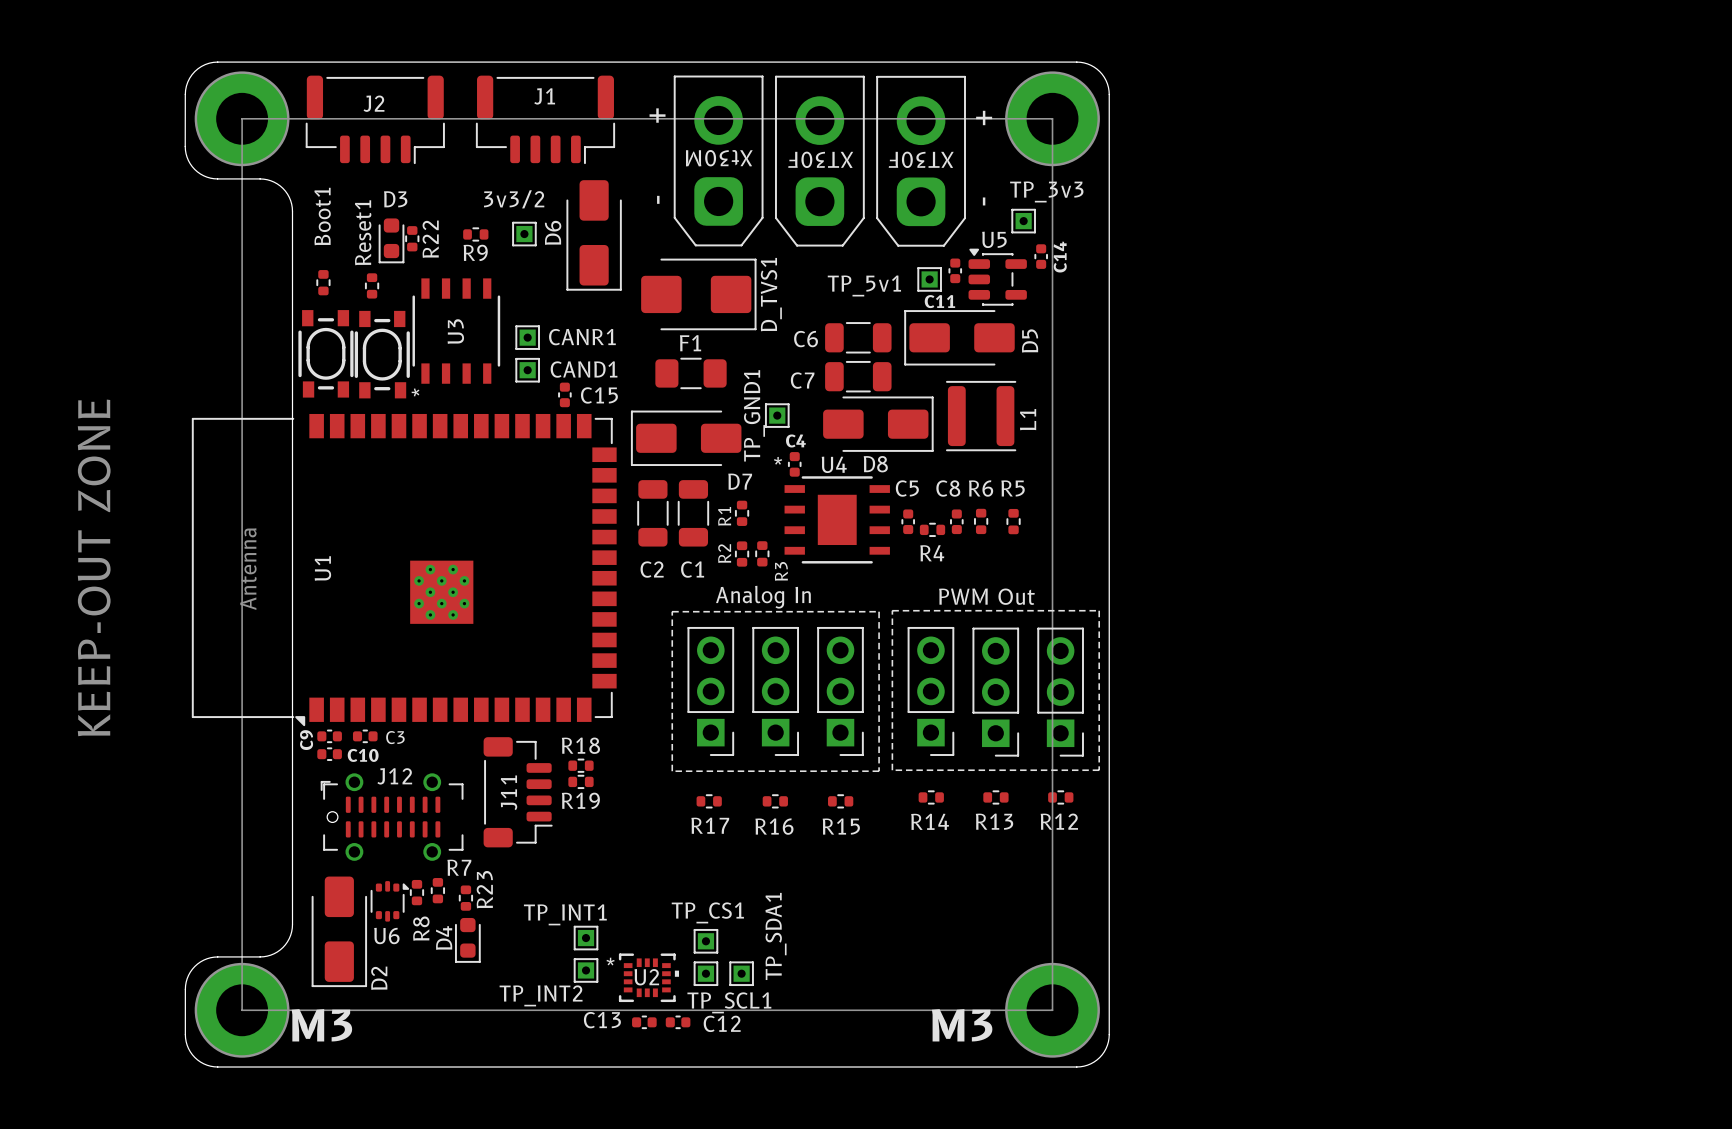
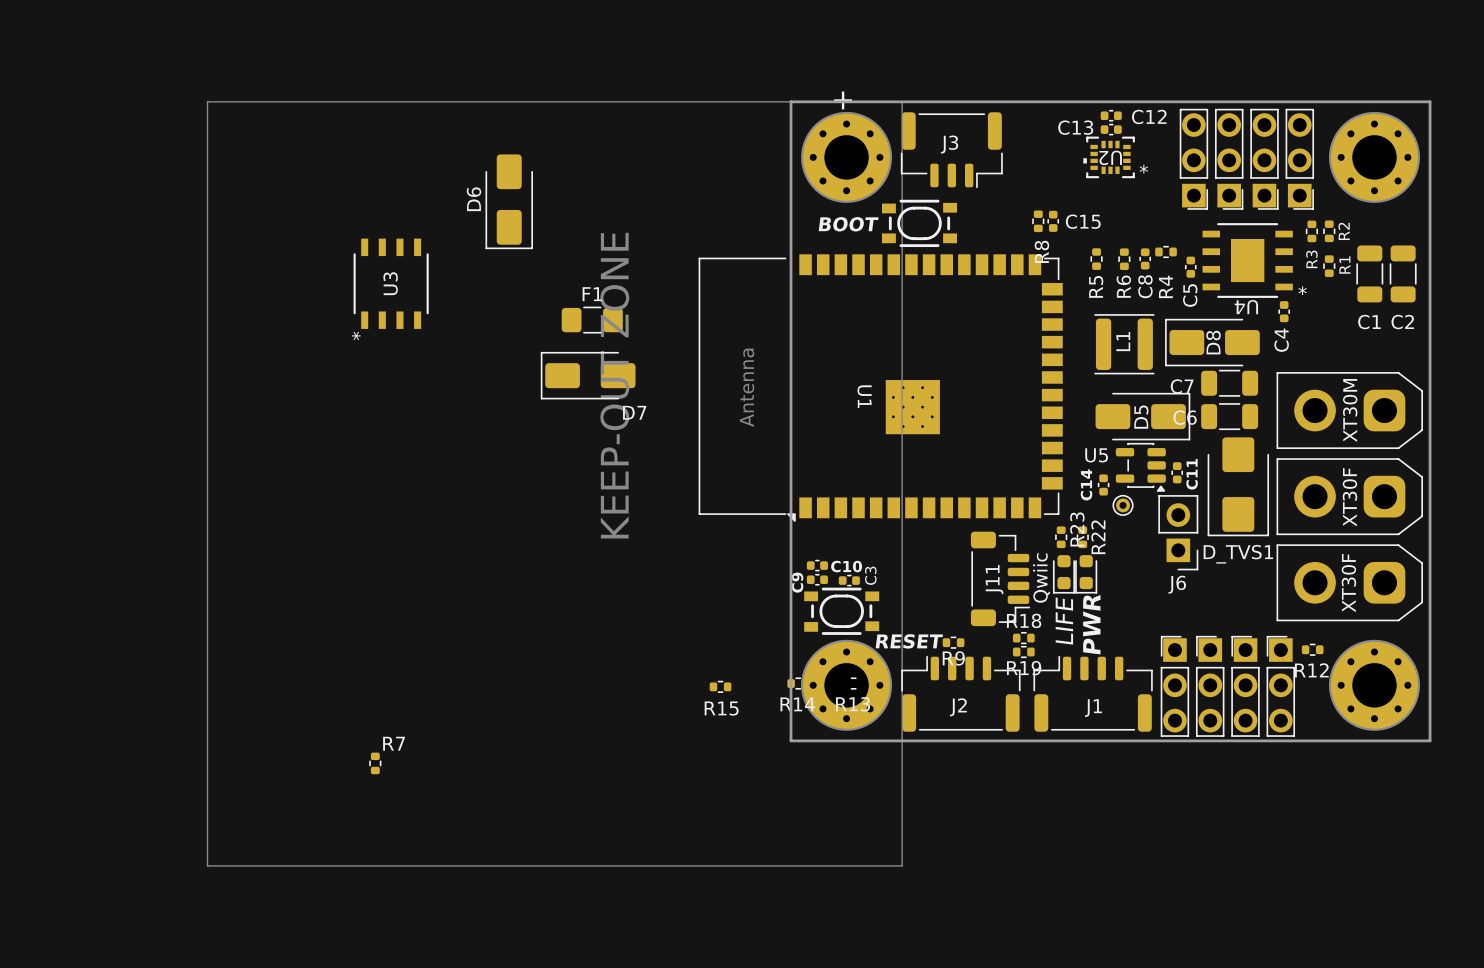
board edge: (217, 62) (1076, 62) (1090, 65) (1102, 74) (1107, 83) (1109, 94) (1109, 1034) (1106, 1048) (1097, 1059) (1087, 1065) (1076, 1067) (217, 1067) (203, 1063) (192, 1054) (187, 1045) (185, 1034) (185, 985) (192, 969) (200, 961) (210, 957) (263, 956) (274, 953) (287, 941) (292, 924) (292, 207) (285, 191) (274, 182) (263, 179) (210, 178) (197, 171) (188, 160) (185, 146) (186, 86) (189, 78) (198, 68) (209, 63) (217, 62) -> none
part: (242, 118) -> none
board edge: none -> (790, 101) (1430, 101) (1430, 740) (790, 740) (790, 101)
part: (1052, 118) -> none
J2 rotation: 0° (375, 119) -> 180° (960, 693)
J2 position: (375, 119) -> (960, 693)
J1 rotation: 0° (545, 119) -> 180° (1093, 693)
J1 position: (545, 119) -> (1093, 693)
text: Xt30M (719, 158) -> none
text: XT30F (820, 159) -> none
text: XT30F (921, 159) -> none
part: (718, 160) -> none
part: (819, 161) -> none
part: (921, 161) -> none
J3: none -> (951, 150)
part: none -> (846, 157)
part: none -> (1374, 157)
part: none -> (1193, 159)
part: none -> (1229, 159)
part: none -> (1264, 159)
part: none -> (1299, 159)
text: - (984, 201) -> none
TP_3v3: (1023, 221) -> none
R9 position: (475, 234) -> (953, 642)
3v3/2: (524, 234) -> none
R22 position: (412, 238) -> (1082, 537)
U5 name position: U5 (994, 239) -> U5 (1096, 455)
D3: (391, 240) -> none
C14 position: (1041, 256) -> (1103, 484)
C14 name position: C14 (1060, 257) -> C14 (1086, 484)
part: none -> BOOT (919, 223)
R2: none -> (1329, 231)
C11 position: (955, 270) -> (1177, 472)
U5 rotation: 0° (997, 277) -> 180° (1140, 467)
U5 position: (997, 277) -> (1140, 467)
TP_5v1: (929, 279) -> none
Boot1: (323, 282) -> none
Reset1: (372, 285) -> none
D_TVS1 rotation: 0° (698, 294) -> 90° clockwise (1238, 486)
D_TVS1 position: (698, 294) -> (1238, 486)
C11 name rotation: 0° (939, 301) -> 90° counterclockwise (1192, 474)
R1: none -> (1329, 266)
CANR1: (527, 337) -> none
C6 position: (858, 337) -> (1229, 416)
D5 rotation: 0° (959, 337) -> 180° (1142, 416)
D5 position: (959, 337) -> (1142, 416)
D5 name position: D5 (1030, 340) -> D5 (1141, 417)
part: (325, 353) -> none
part: (382, 354) -> none
C4: none -> (1284, 311)
CAND1: (527, 370) -> none
C7 position: (858, 376) -> (1229, 383)
C15 position: (564, 394) -> (1053, 221)
TP_GND1: (777, 415) -> none
L1 position: (981, 416) -> (1124, 344)
L1 name position: L1 (1028, 419) -> L1 (1123, 341)
D8 rotation: 0° (878, 424) -> 180° (1212, 342)
D8 position: (878, 424) -> (1212, 342)
text: C4 (795, 440) -> none
U4 text rotation: 0° (778, 460) -> 180° (1302, 290)
U4 text position: * (778, 460) -> * (1302, 290)
part: (794, 464) -> none
U4 name rotation: 0° (834, 464) -> 180° (1246, 307)
U4 name position: U4 (834, 464) -> U4 (1246, 307)
D8 name position: D8 (875, 464) -> D8 (1213, 342)
part: none -> XT30M (1349, 410)
C5 name rotation: 0° (907, 488) -> 90° counterclockwise (1190, 295)
C5 name position: C5 (907, 488) -> C5 (1190, 295)
C8 name rotation: 0° (948, 488) -> 90° counterclockwise (1145, 286)
C8 name position: C8 (948, 488) -> C8 (1145, 286)
R6 name rotation: 0° (981, 488) -> 90° counterclockwise (1123, 286)
R6 name position: R6 (981, 488) -> R6 (1123, 286)
R5 name rotation: 0° (1013, 488) -> 90° counterclockwise (1096, 286)
R5 name position: R5 (1013, 488) -> R5 (1096, 286)
C2 position: (652, 513) -> (1403, 273)
C1 position: (693, 513) -> (1369, 273)
part: (742, 513) -> none
text: R1 (724, 516) -> none
U4 position: (837, 519) -> (1247, 260)
C5 position: (908, 521) -> (1190, 267)
C8 position: (956, 521) -> (1145, 258)
R6 position: (981, 521) -> (1124, 259)
R5 position: (1013, 521) -> (1096, 259)
R4 position: (932, 529) -> (1166, 251)
text: R2 (724, 553) -> none
R3 position: (762, 553) -> (1311, 231)
R4 name rotation: 0° (932, 553) -> 90° counterclockwise (1165, 286)
part: (742, 554) -> none
U1 name rotation: 0° (322, 568) -> 180° (864, 396)
U1 name position: U1 (322, 568) -> U1 (864, 396)
U1 position: (404, 570) -> (880, 388)
R3 name position: R3 (781, 571) -> R3 (1311, 259)
part: none -> XT30F (1349, 496)
part: none -> (1123, 505)
text: PWM Out (986, 596) -> none
text: Analog In (763, 597) -> none
line: (892, 610) (1099, 610) (1099, 770) (892, 770) (892, 610) -> none
line: (672, 611) (879, 611) (879, 771) (672, 771) (672, 611) -> none
J6: none -> (1178, 532)
part: none -> LIFE (1063, 574)
part: none -> PWR (1086, 574)
J11 value: none -> Qwiic (1041, 578)
part: none -> XT30F (1349, 582)
part: (710, 691) -> none
part: (775, 691) -> none
part: (840, 691) -> none
part: (930, 691) -> none
part: (995, 692) -> none
part: (1060, 692) -> none
part: none -> RESET (841, 611)
C9 position: (329, 736) -> (817, 579)
C3 position: (365, 736) -> (849, 580)
C3 name rotation: 0° (395, 737) -> 90° counterclockwise (870, 575)
C10 position: (329, 754) -> (817, 565)
R18 position: (580, 765) -> (1023, 638)
R19 position: (580, 781) -> (1023, 651)
J11 position: (518, 792) -> (1000, 578)
R12 position: (1060, 797) -> (1312, 649)
part: none -> (846, 685)
part: none -> (1374, 685)
part: none -> (1174, 686)
part: none -> (1210, 686)
part: none -> (1245, 686)
part: none -> (1280, 686)
R17: (709, 801) -> none
R16: (775, 801) -> none
J12: (392, 817) -> none
R8 position: (416, 892) -> (1038, 221)
R23 position: (465, 898) -> (1061, 537)
U6: (389, 901) -> none
D2: (339, 931) -> none
TP_INT1: (586, 938) -> none
D4: (467, 940) -> none
TP_CS1: (705, 941) -> none
U2 footprint: [618, 953, 680, 1003] -> [1083, 136, 1135, 179]
TP_INT2: (586, 970) -> none
TP_SCL1: (705, 973) -> none
TP_SDA1: (741, 973) -> none
part: (242, 1010) -> none
part: (1052, 1010) -> none
C13 position: (644, 1022) -> (1111, 129)
C12 position: (678, 1022) -> (1111, 115)
text: M3 (321, 1025) -> none
text: M3 (962, 1025) -> none

